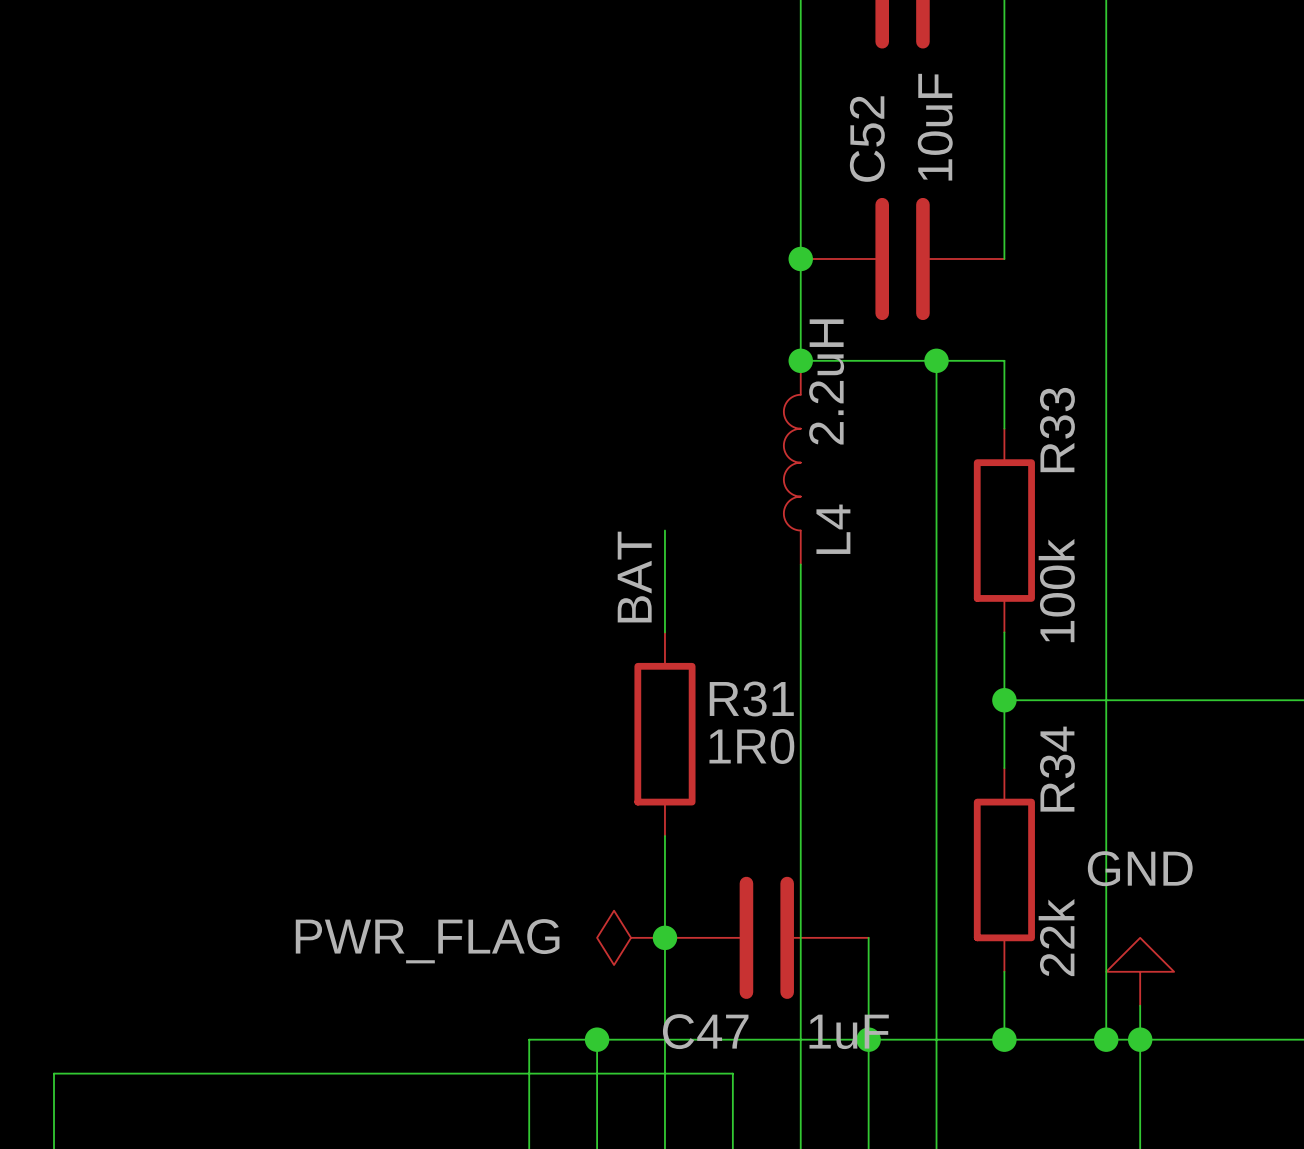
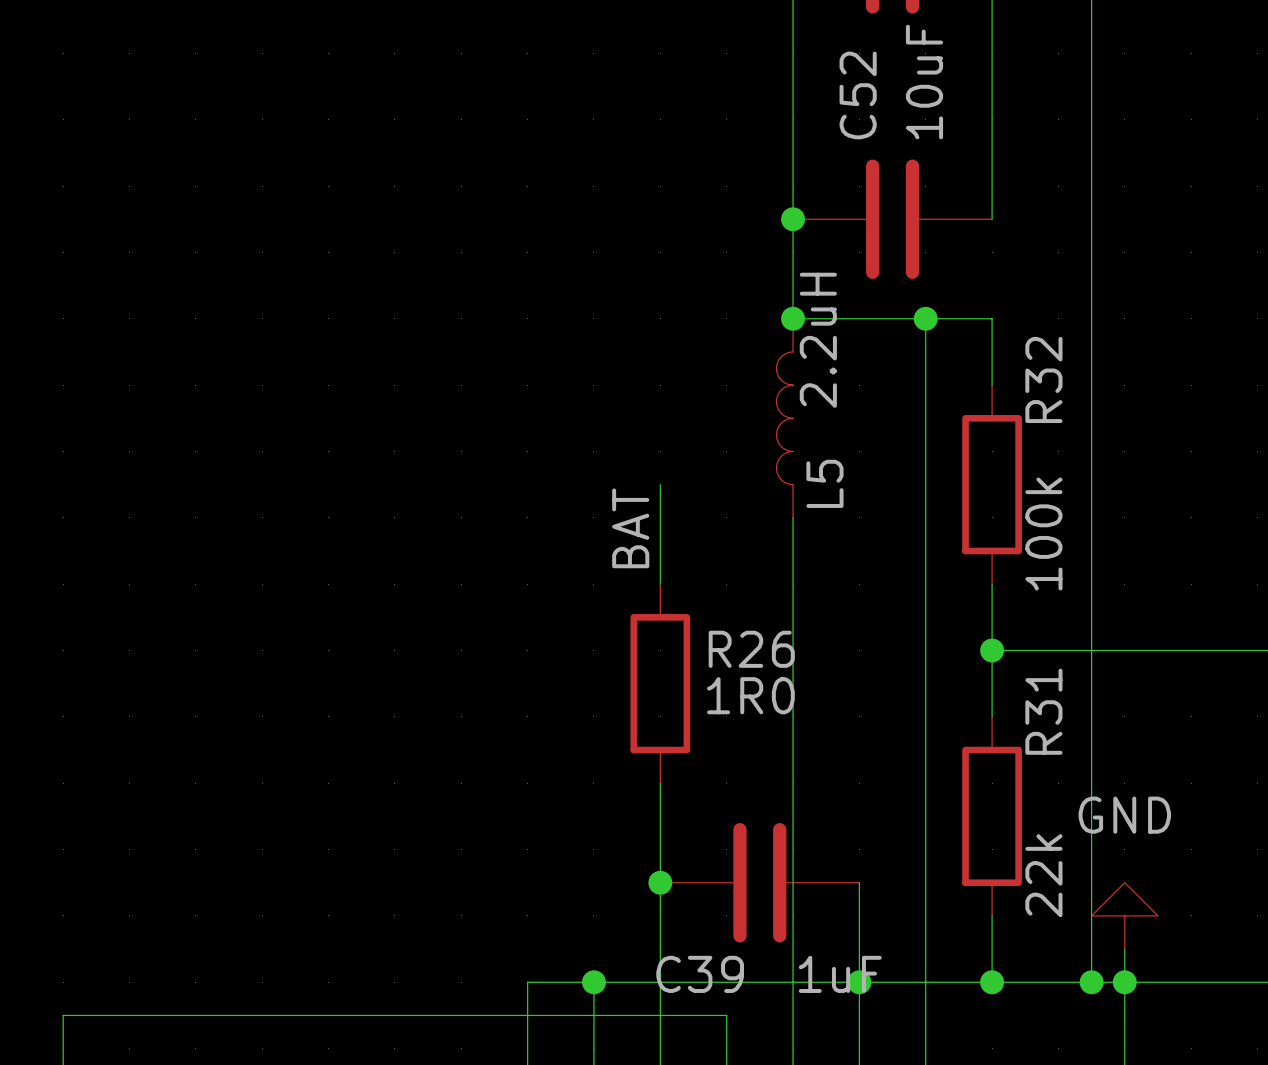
R33 name: R33 (1057, 430) -> R32 (1043, 379)
L4 name: L4 (833, 529) -> L5 (824, 483)
R31 name: R31 (751, 698) -> R26 (751, 649)
R34 name: R34 (1057, 769) -> R31 (1043, 711)
power symbol: PWR_FLAG (631, 937) -> none
C47 name: C47 (705, 1031) -> C39 (700, 974)

